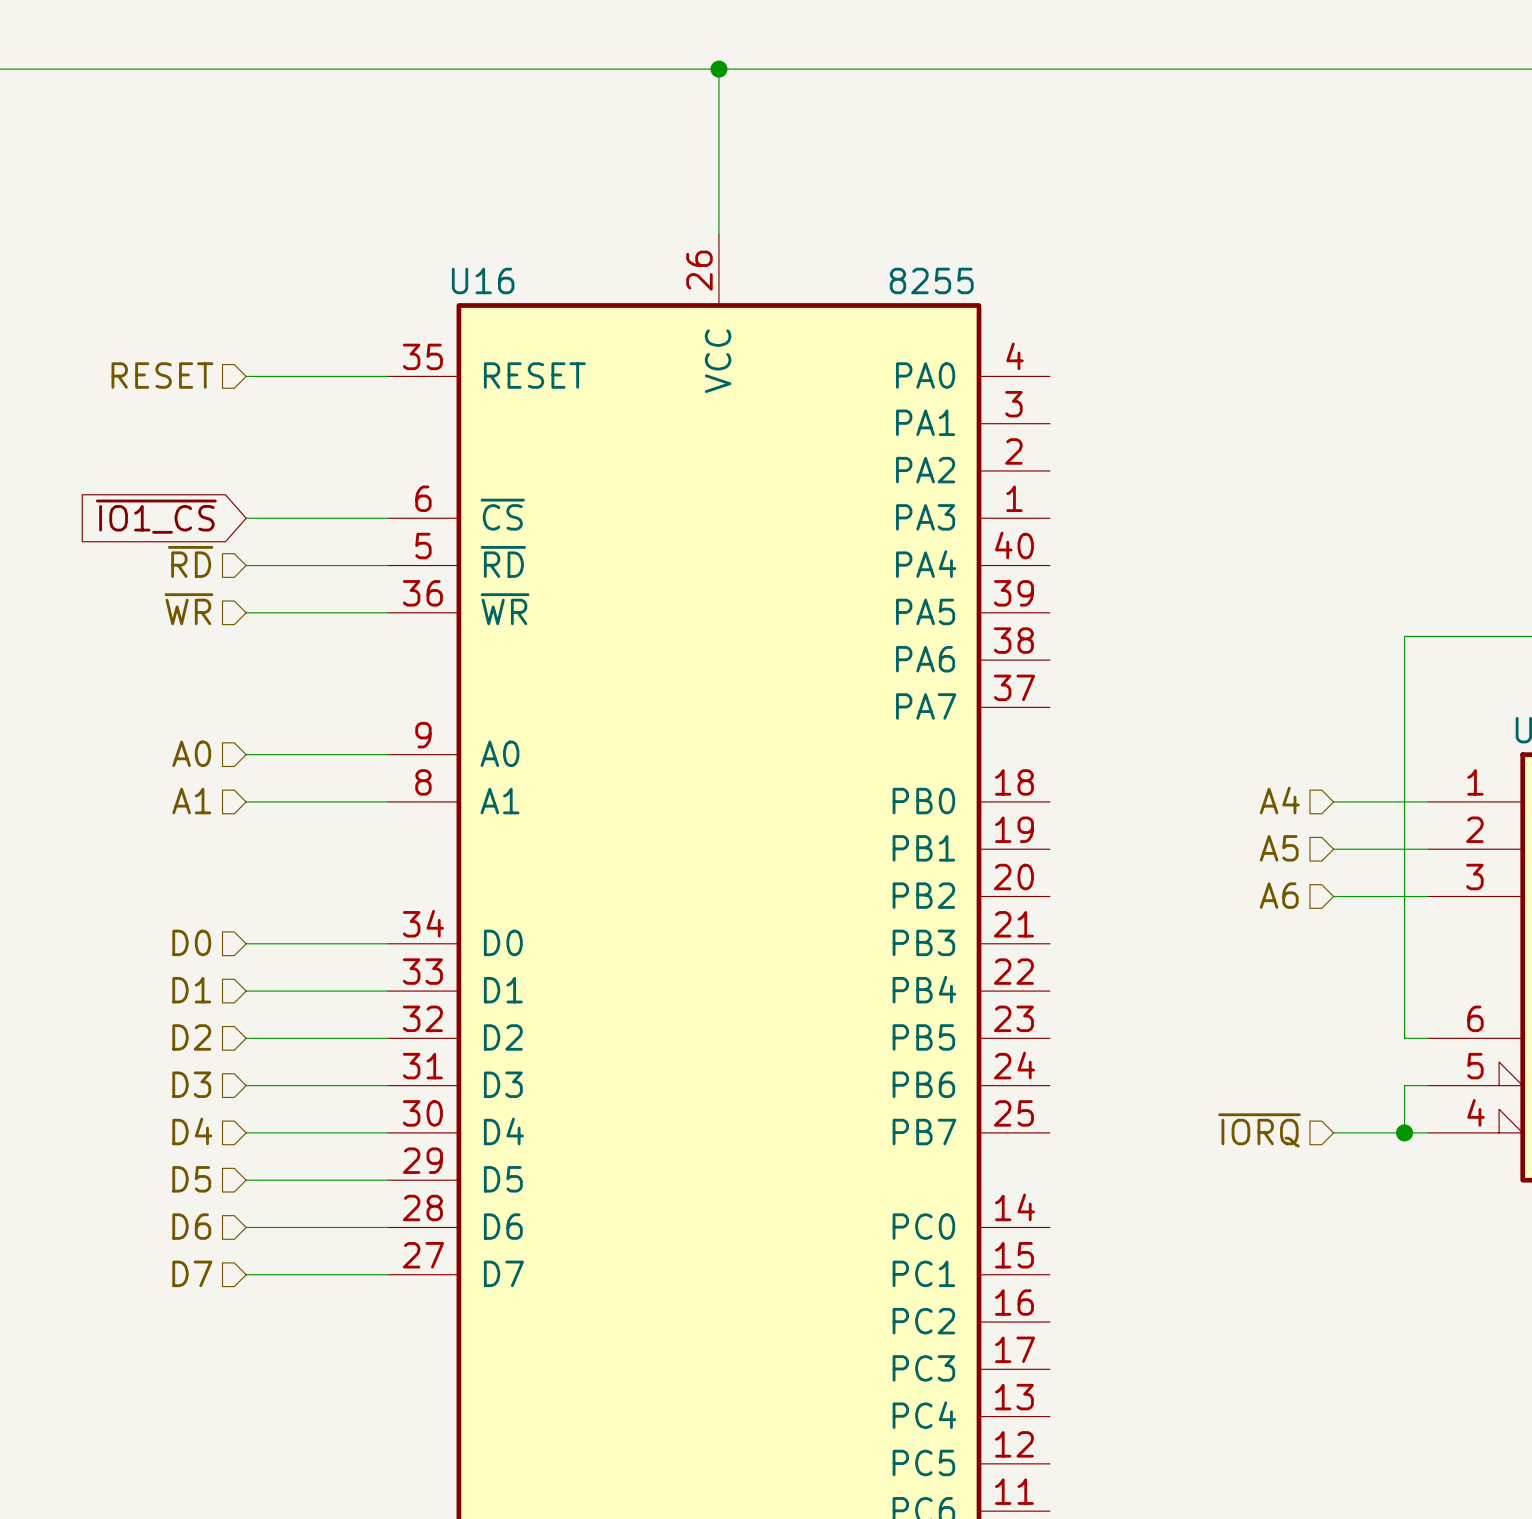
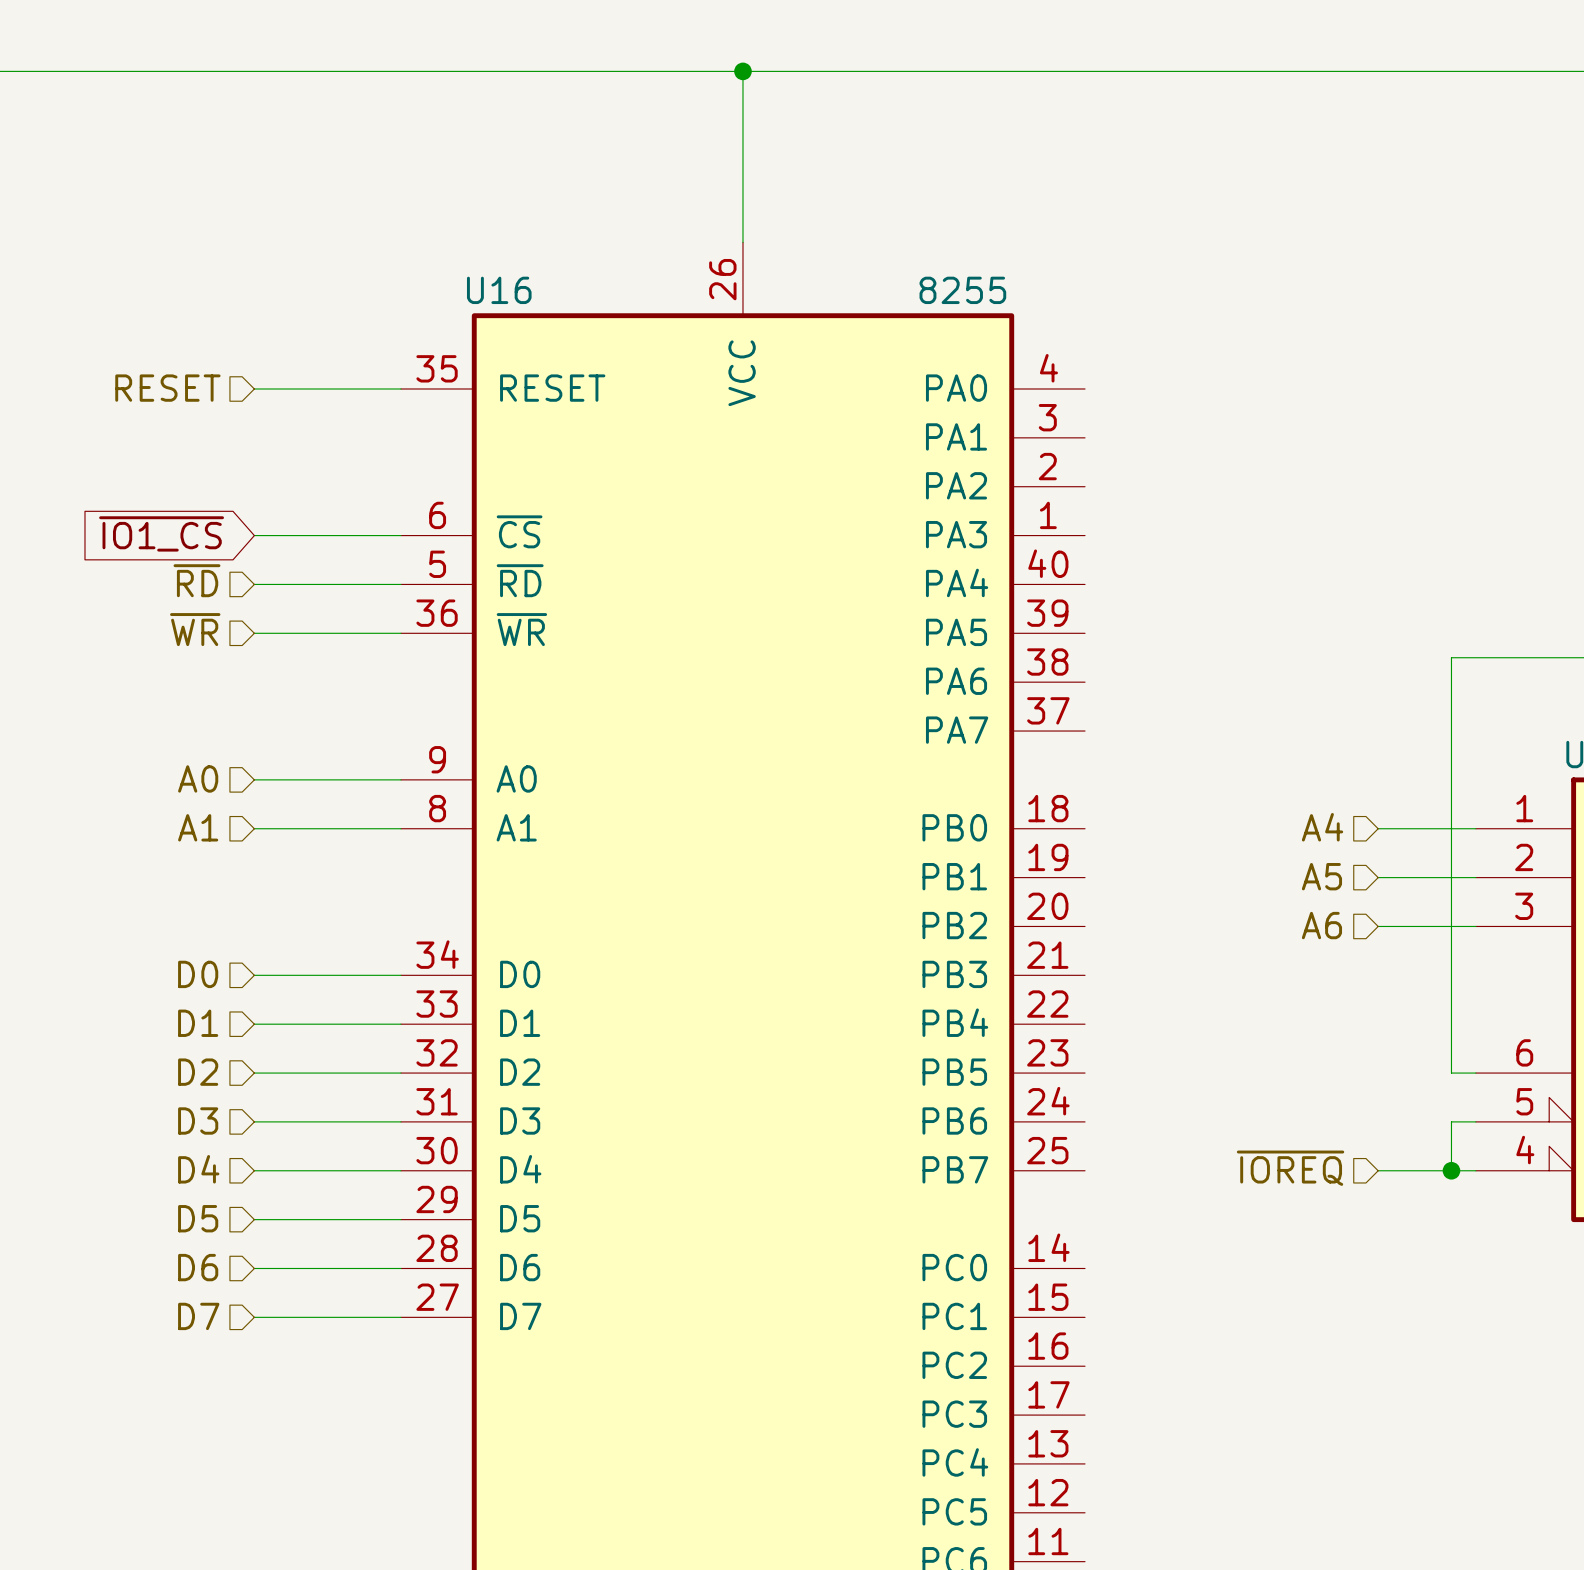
hierarchical label: ~{IORQ} (1259, 1130) -> ~{IOREQ} (1290, 1168)

